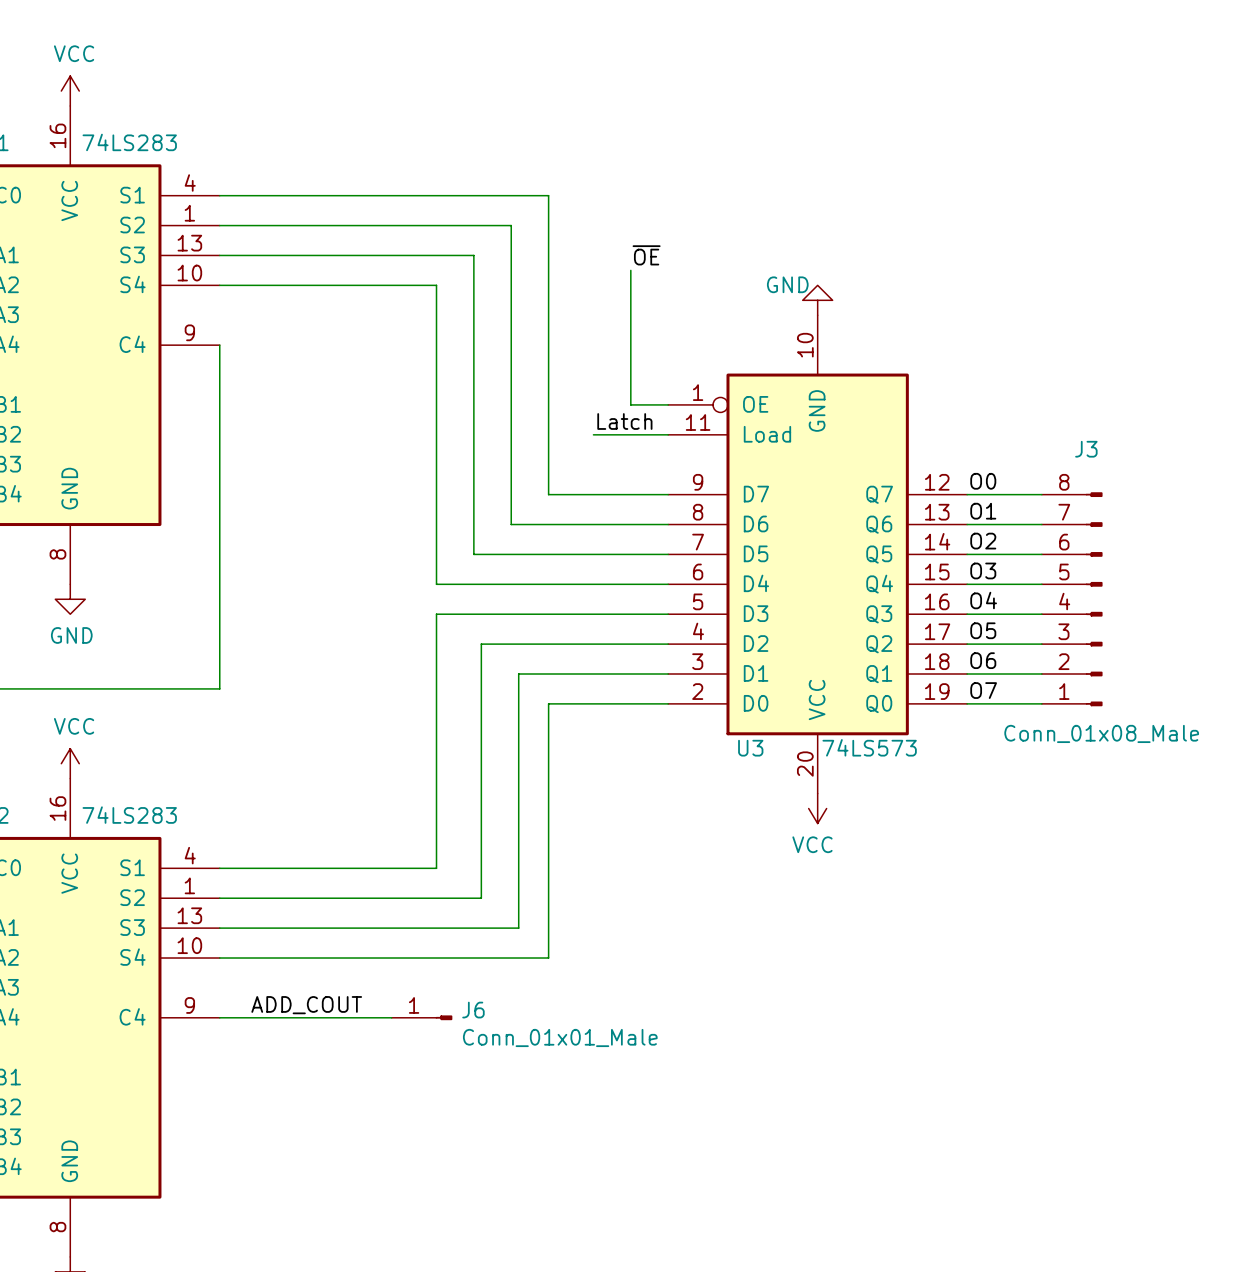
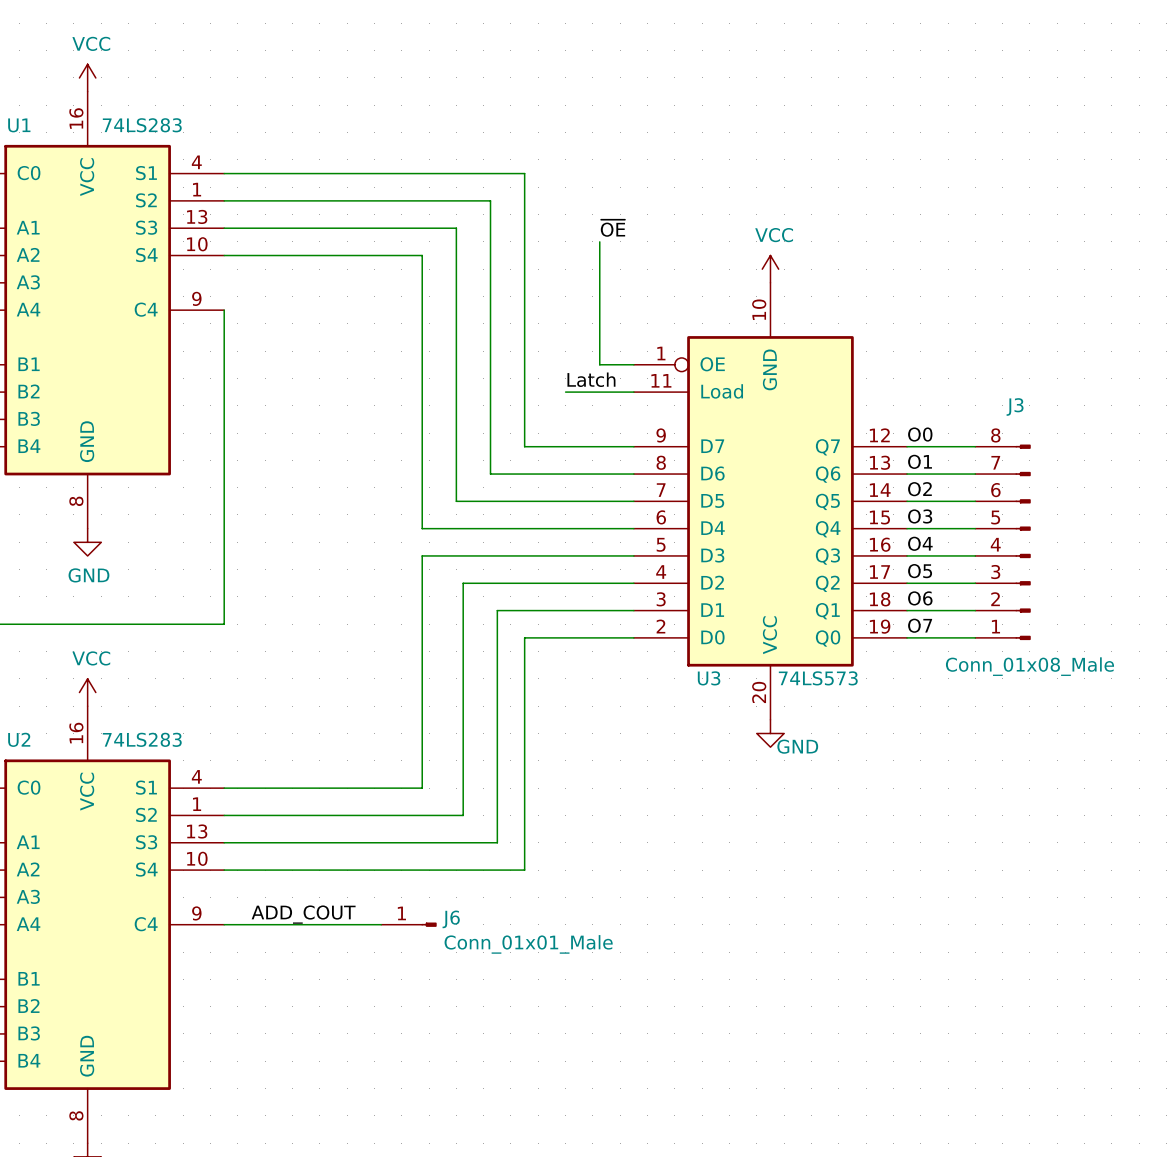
power symbol: GND (817, 300) -> VCC (770, 269)
power symbol: VCC (817, 808) -> GND (770, 733)

